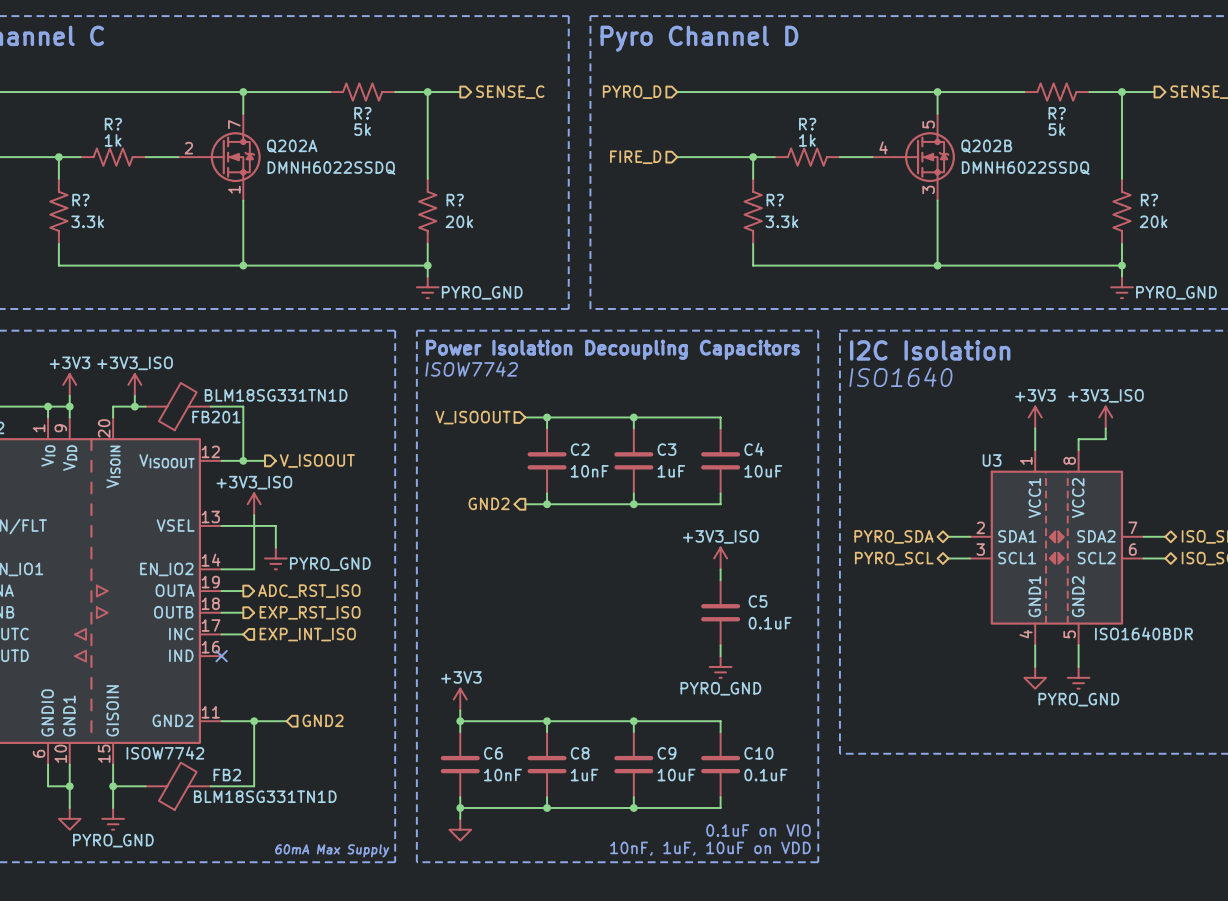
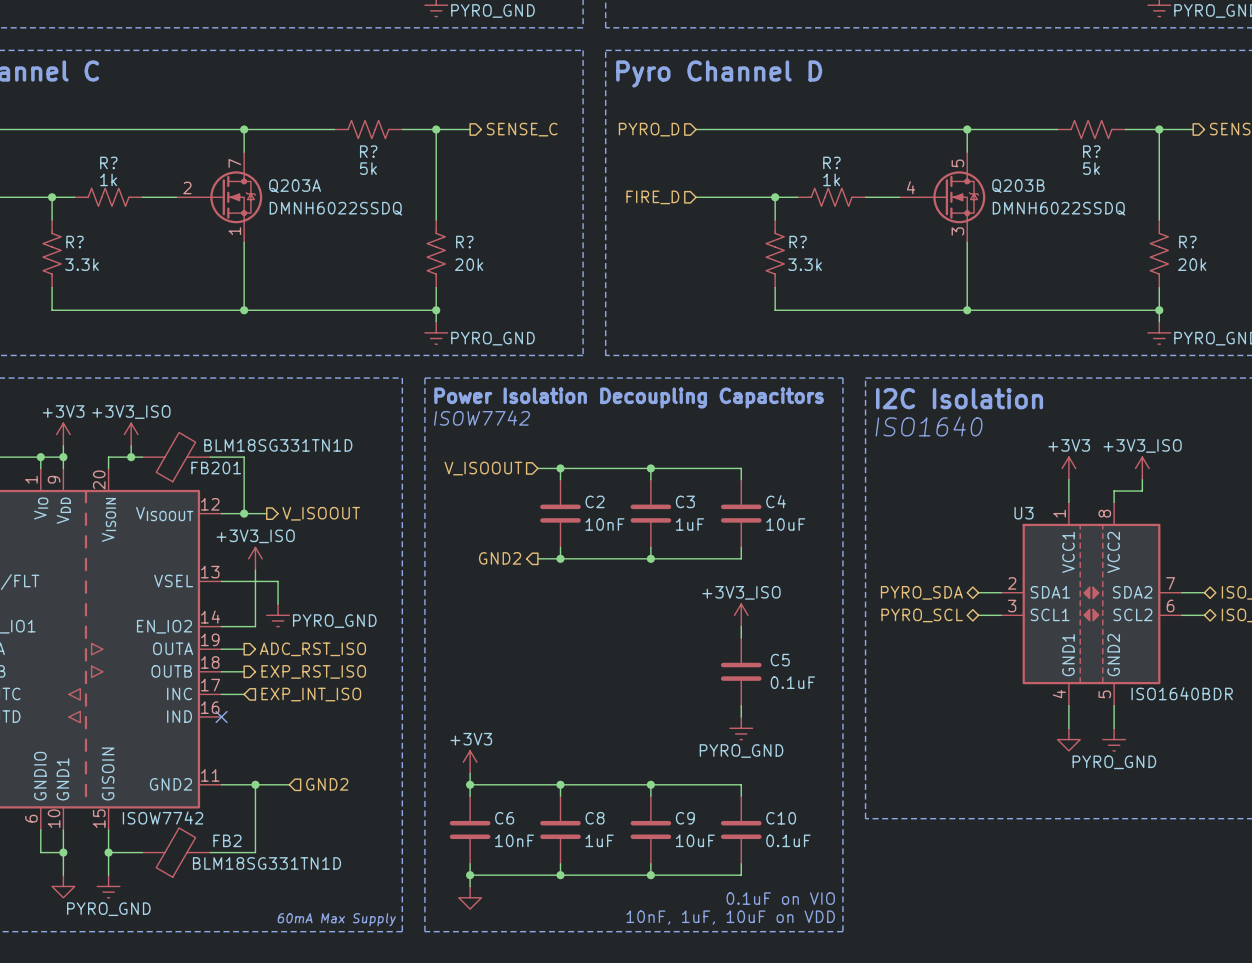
Q202A name: Q202A (292, 146) -> Q203A (295, 186)
Q202B name: Q202B (986, 146) -> Q203B (1018, 186)

